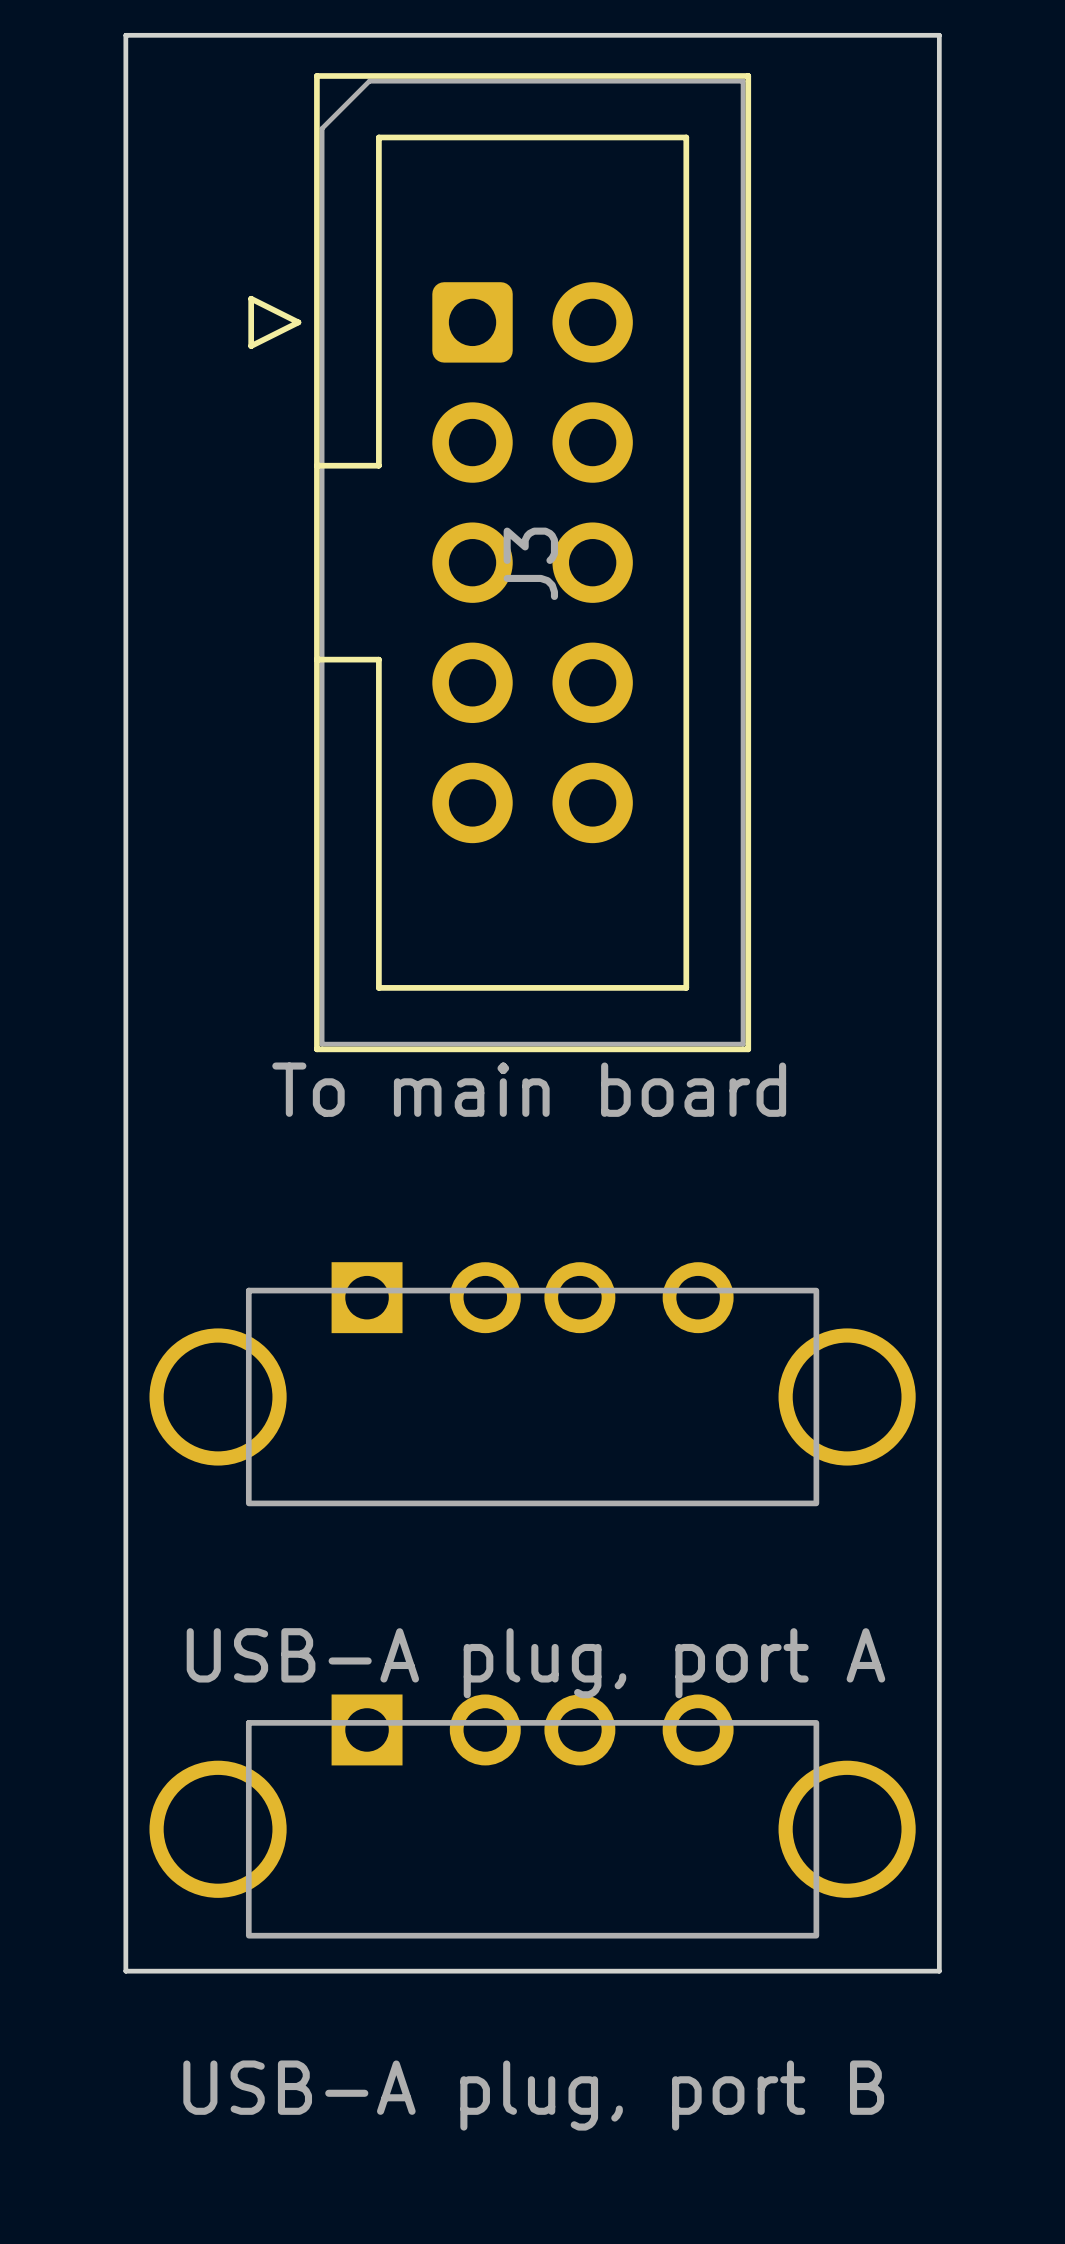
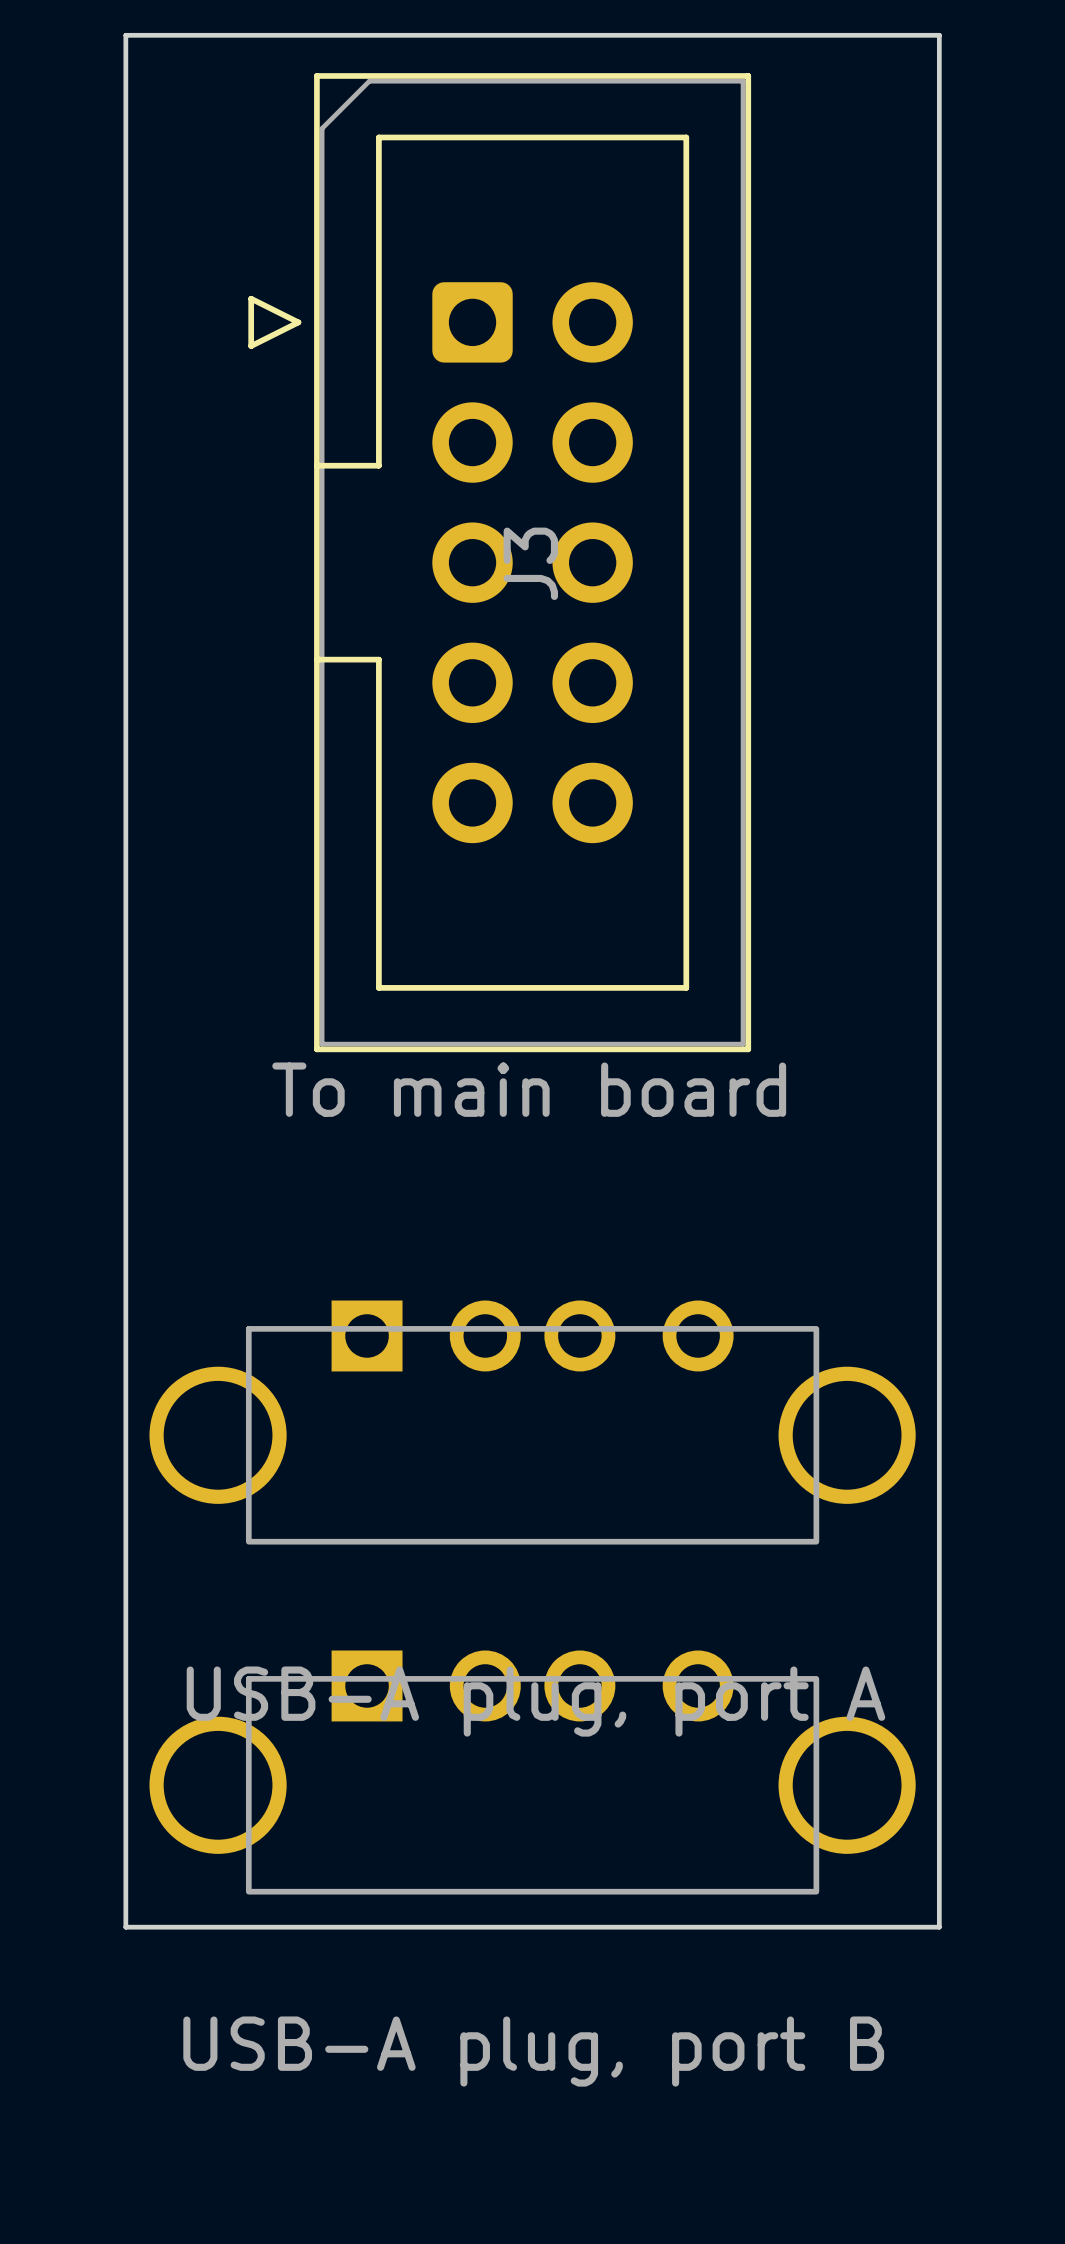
part position: (532, 1384) -> (532, 1422)
part position: (532, 1816) -> (532, 1772)
board edge: (125, 1927) (125, 1971) (939, 1971) (939, 1927) -> (125, 1927) (939, 1927)

